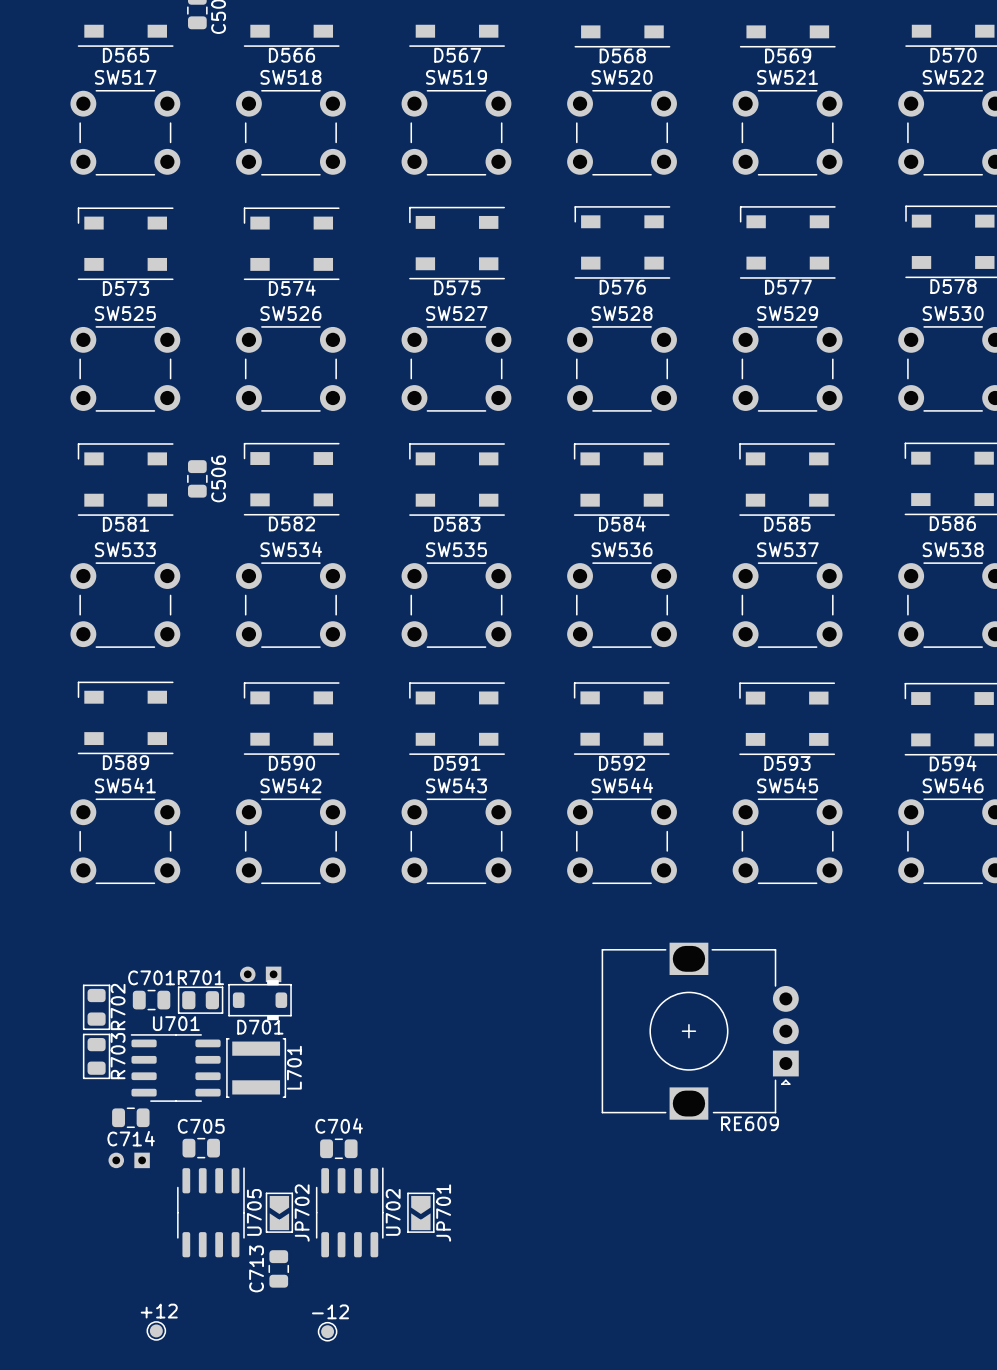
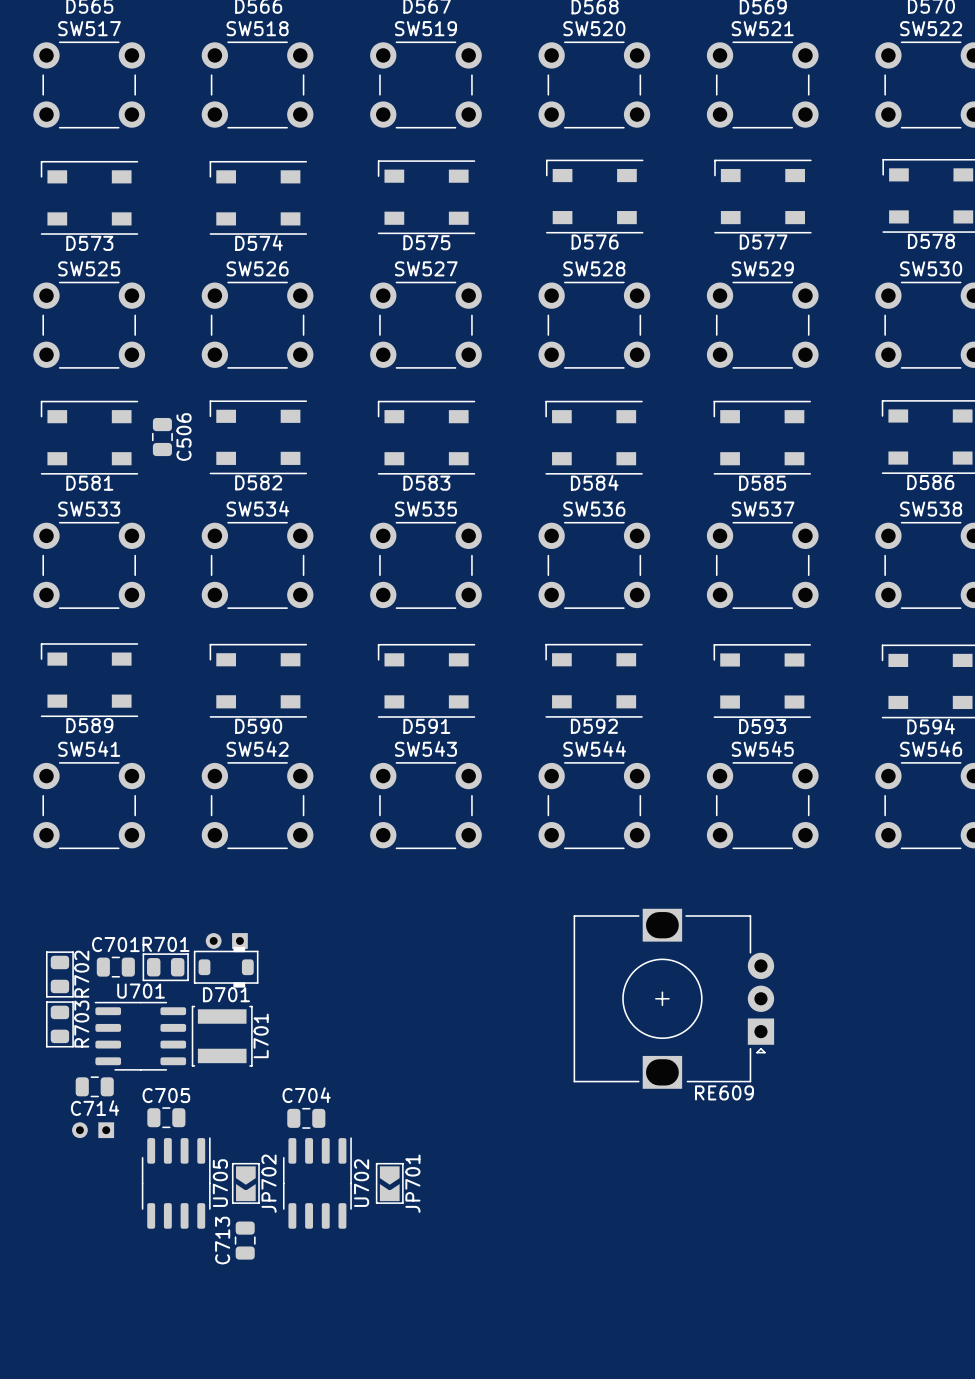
part: +12 (156, 1330) -> none
part: -12 (327, 1331) -> none

